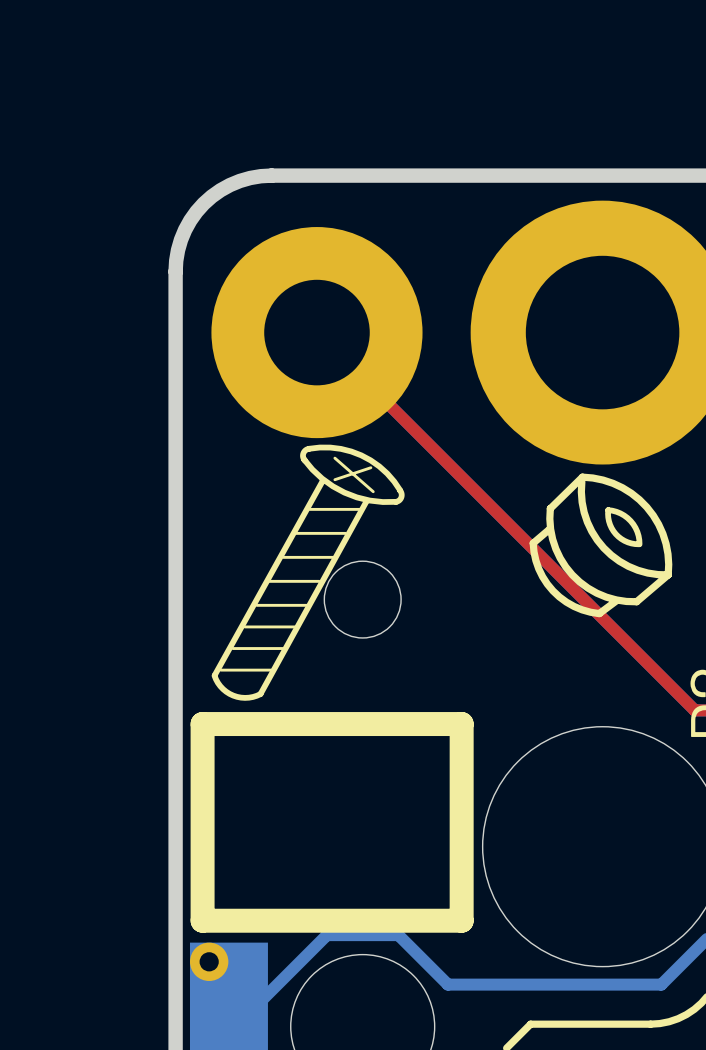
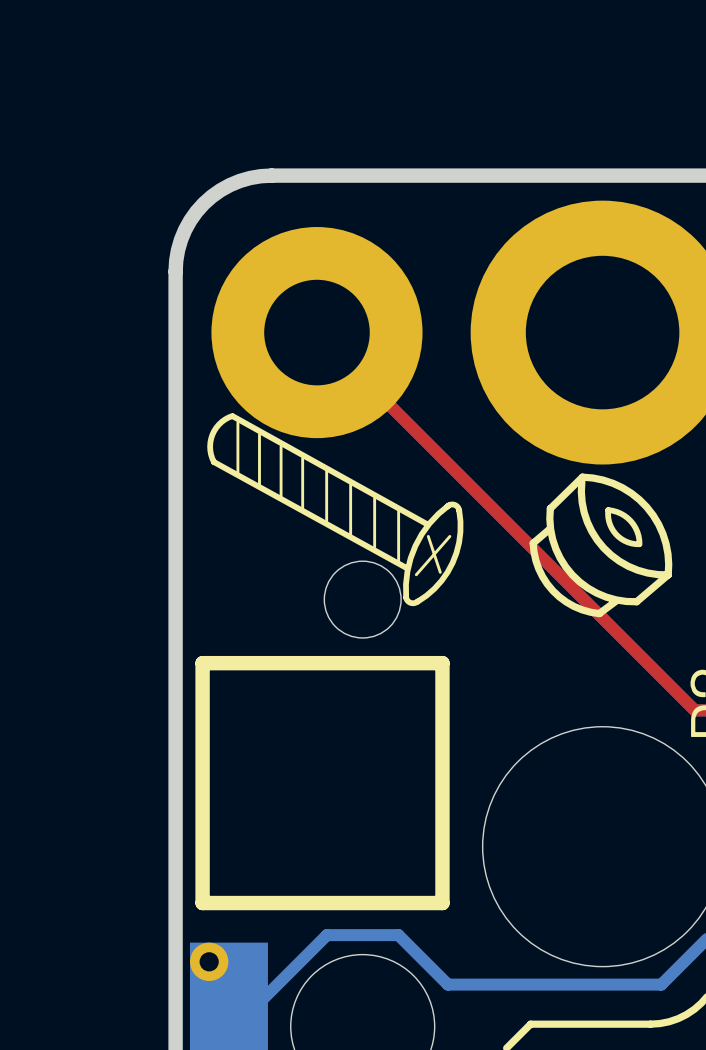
drawing: none -> [207, 413, 464, 607]
drawing: [211, 444, 405, 701] -> none
line: (202, 724) (461, 724) (461, 920) (202, 920) (202, 903) -> (202, 724) (202, 663) (442, 663) (442, 903) (202, 903)
line width: thick (202, 724) (202, 903) -> thin (202, 724) (202, 903)

